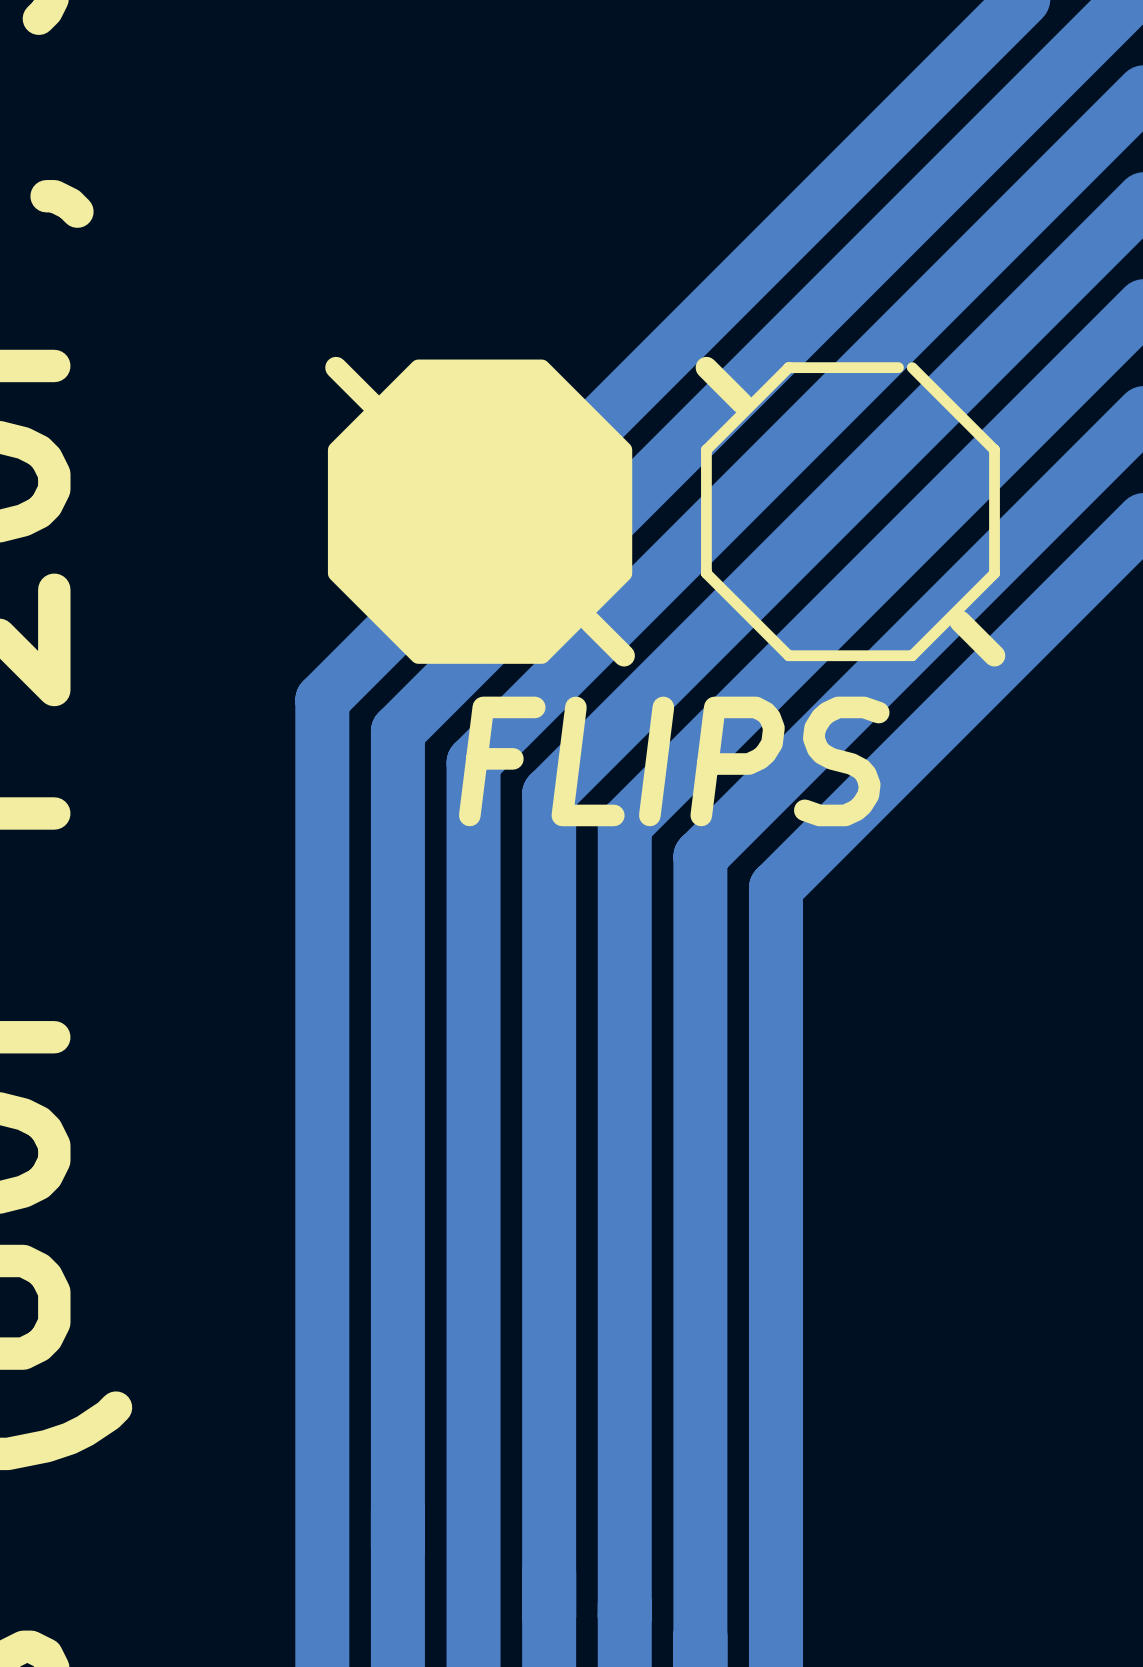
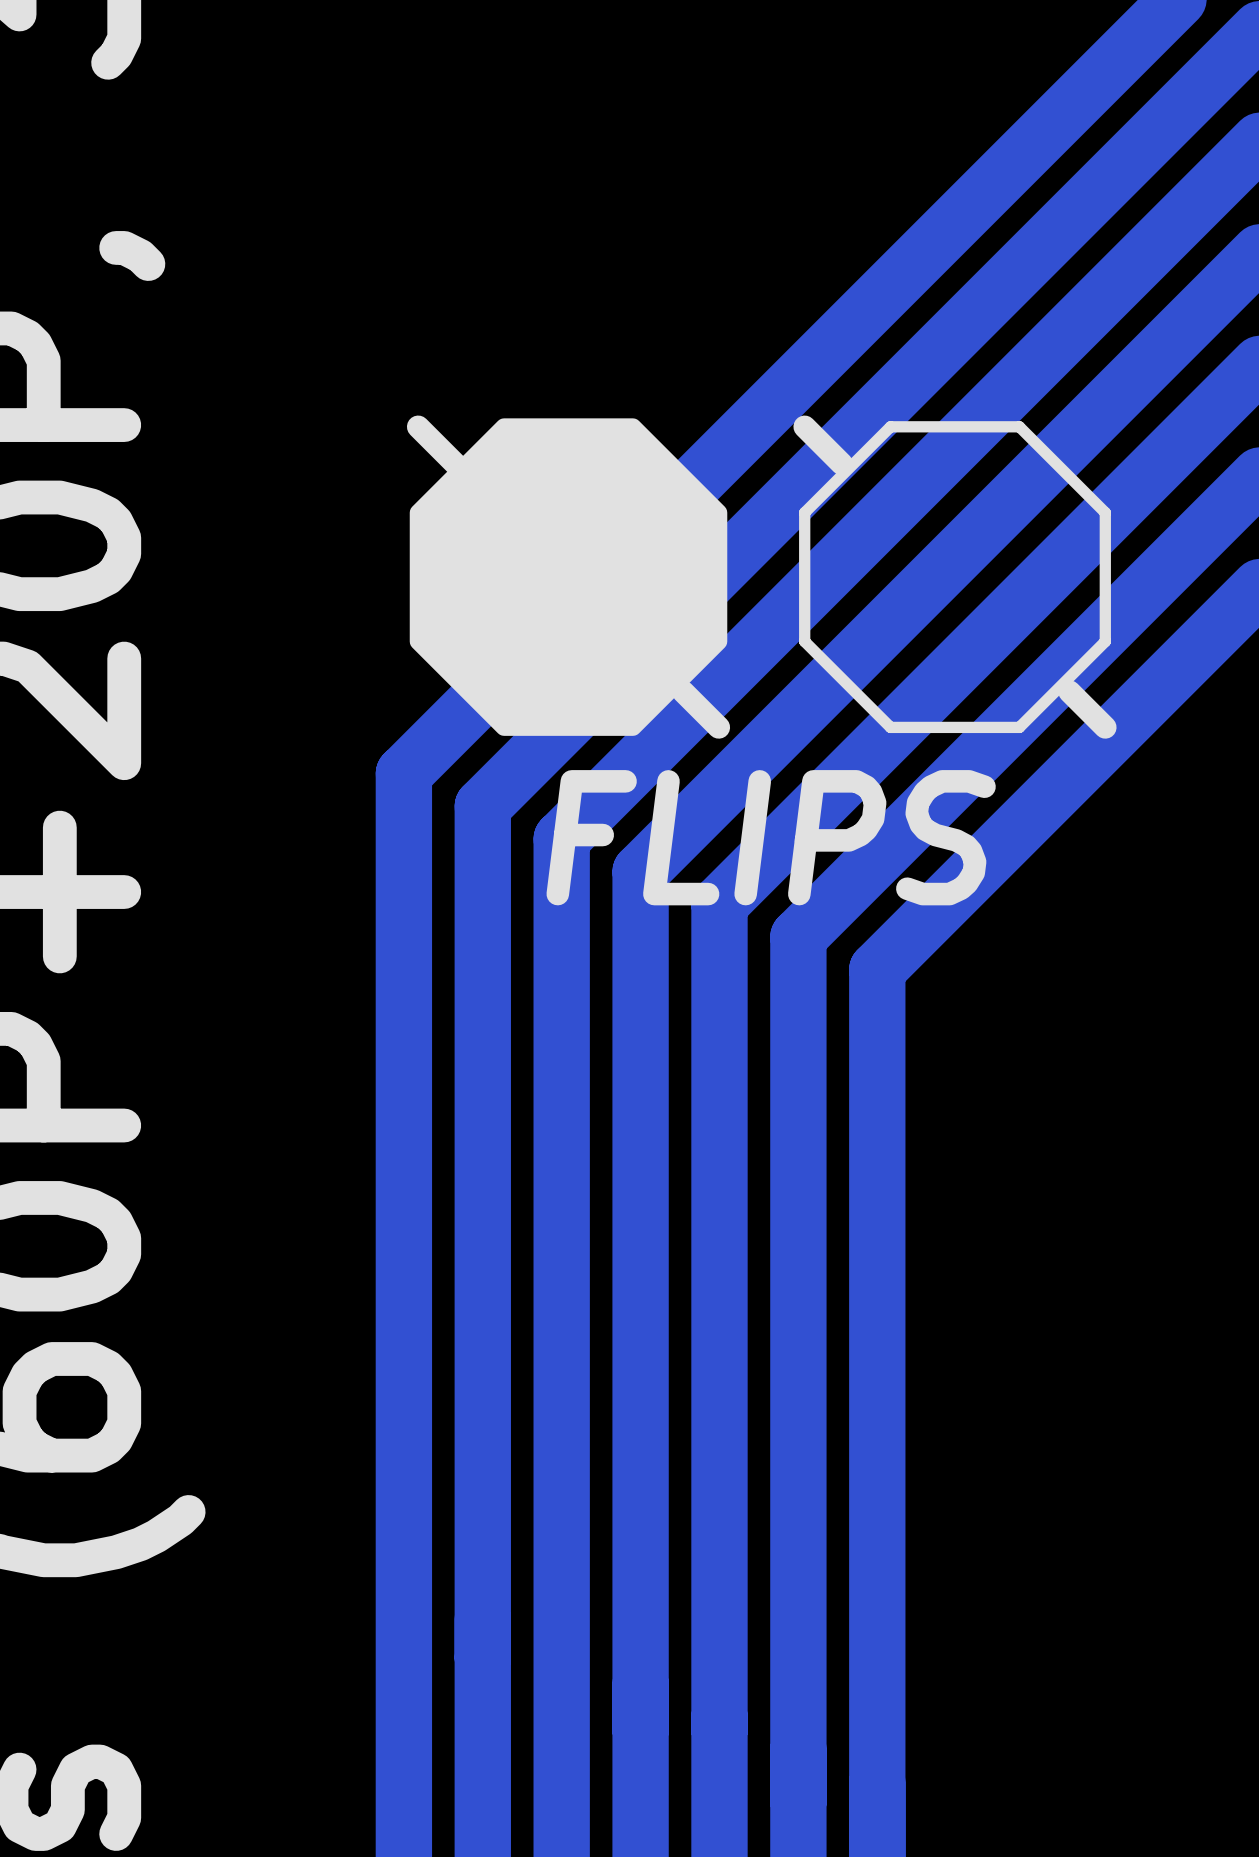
drawing shape: [325, 356, 1006, 827] -> [406, 415, 1117, 906]

